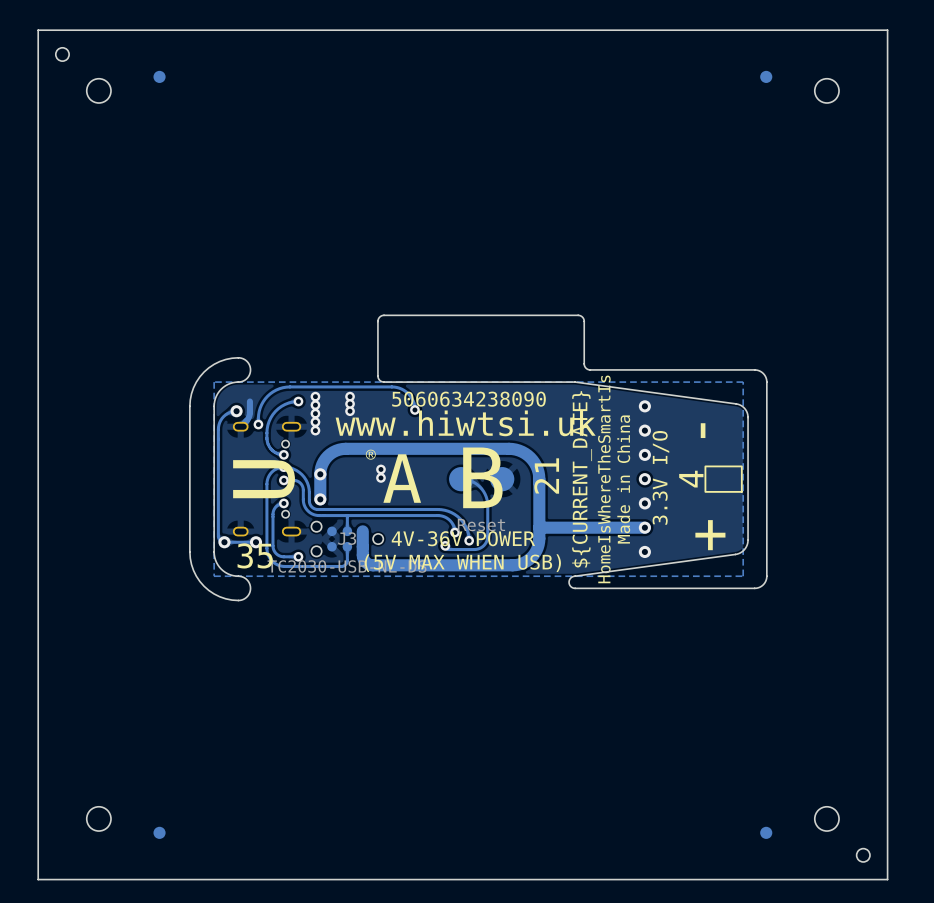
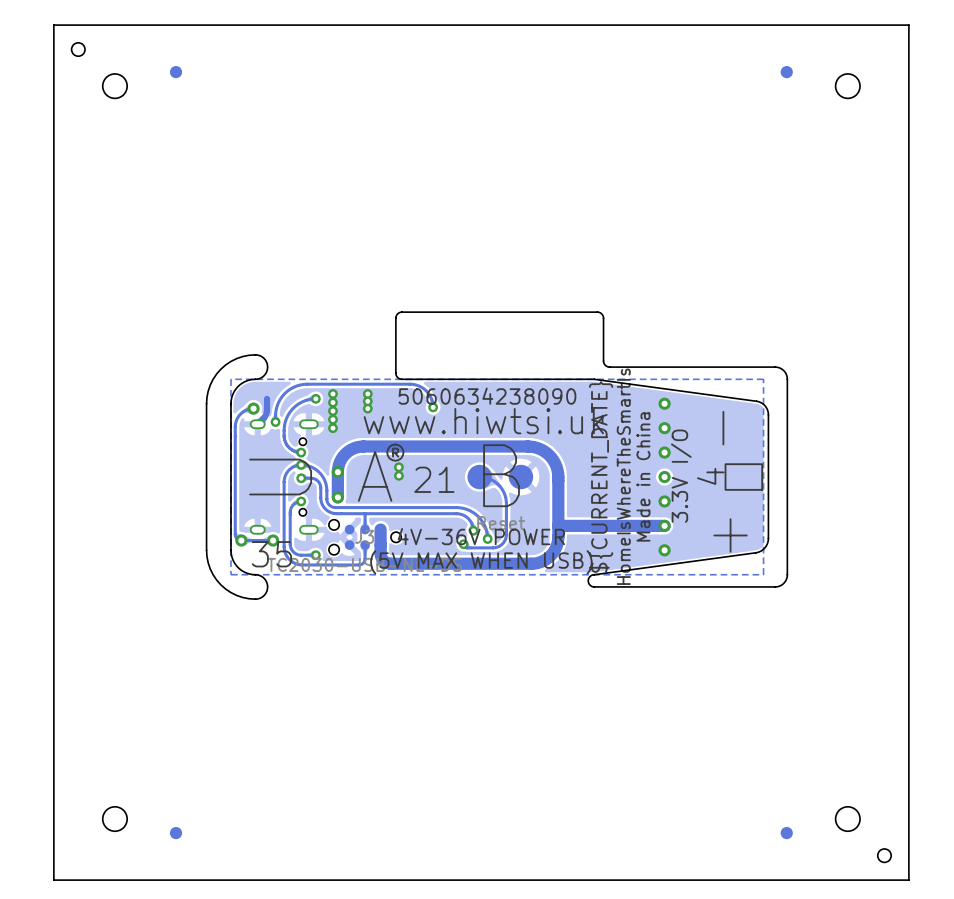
text rotation: 0° (546, 476) -> 90° clockwise (434, 479)
text position: 21 (546, 476) -> 21 (434, 479)
text position: A (402, 478) -> A (375, 476)

